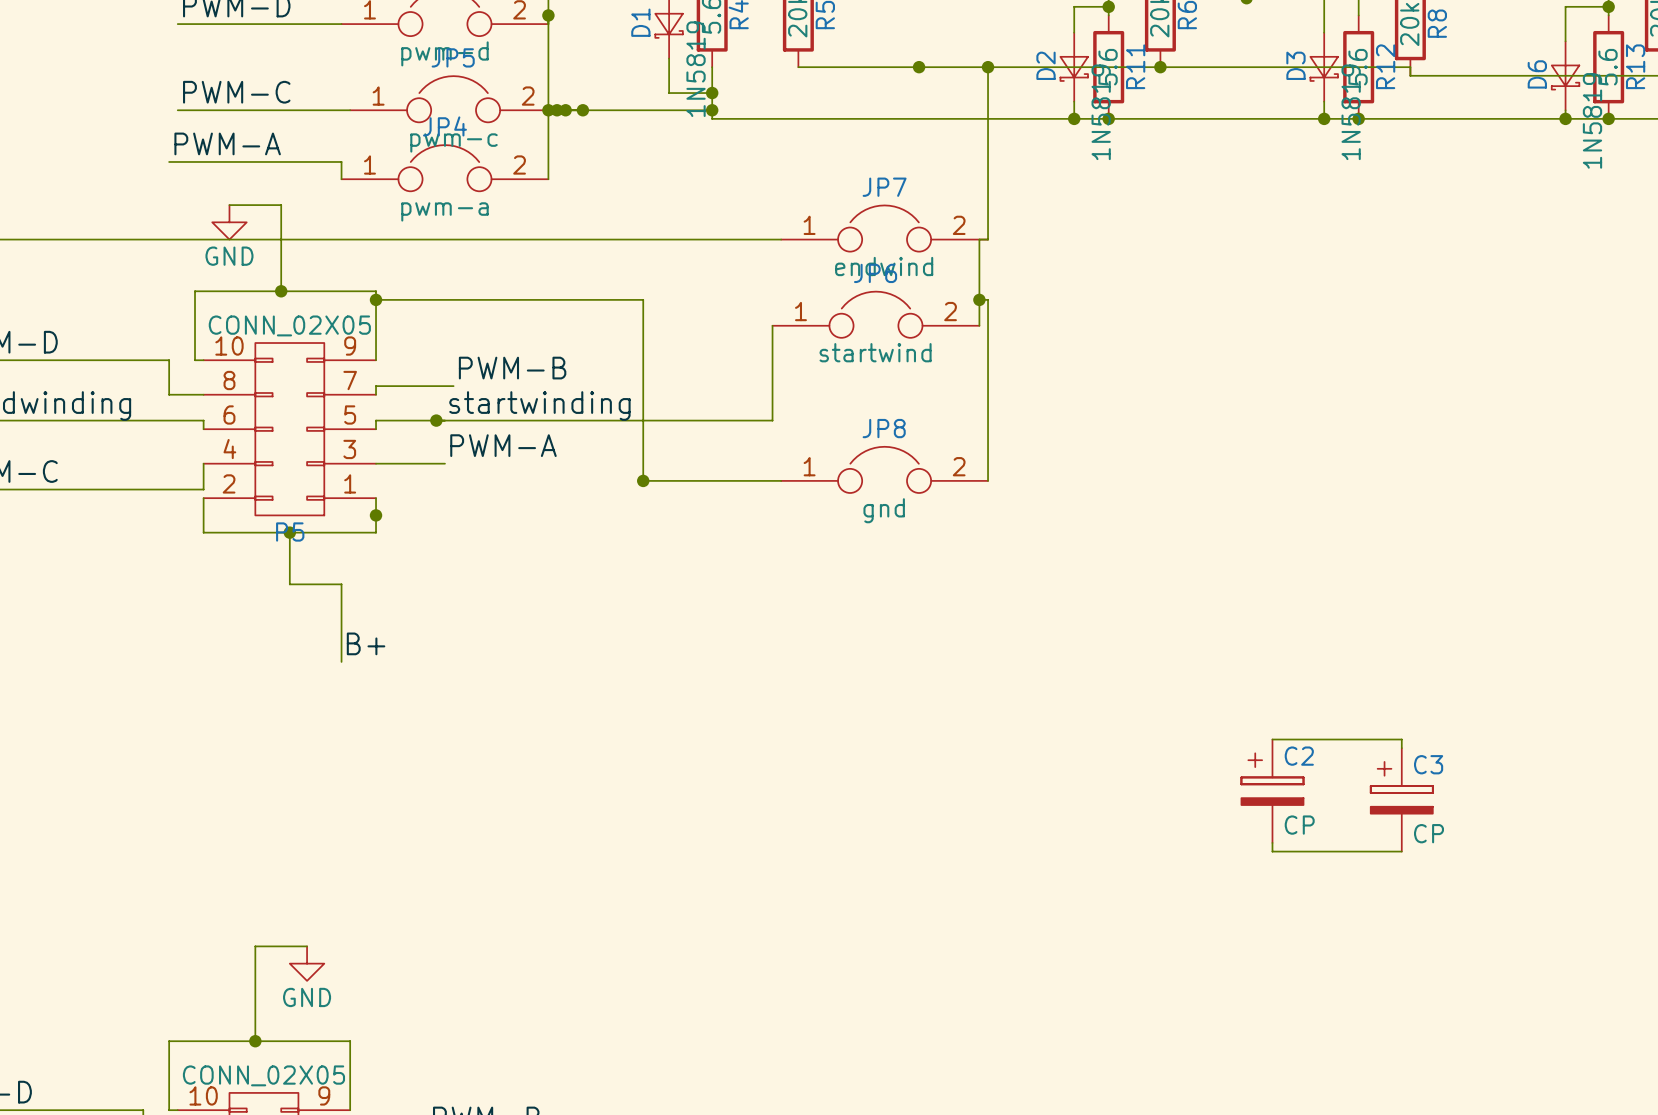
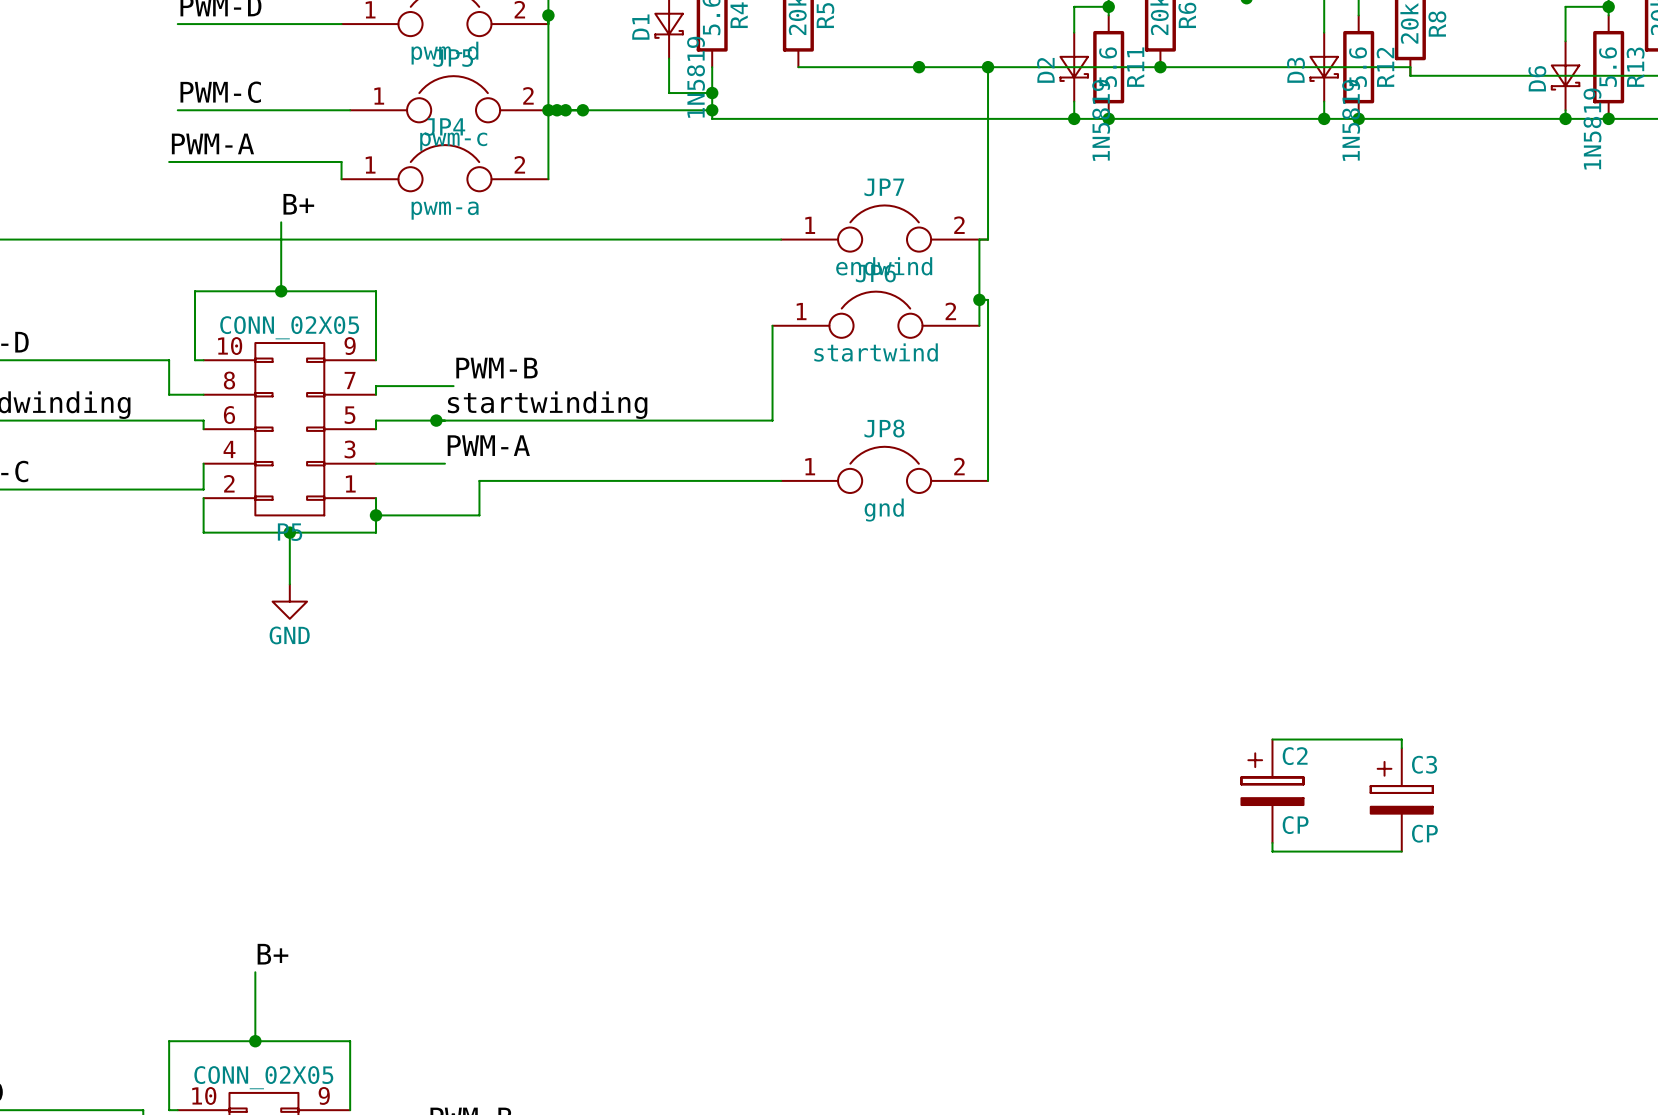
label: none -> B+ (298, 204)
wire: (229, 205) (281, 205) (281, 222) -> none
power symbol: GND (229, 222) -> none
wire: (376, 299) (643, 299) (643, 480) -> (376, 515) (479, 515) (479, 480) (643, 480)
junction: (376, 299) -> none
junction: (643, 480) -> none
wire: (289, 584) (341, 584) (341, 661) -> none
power symbol: none -> GND (289, 601)
label: B+ (366, 643) -> none
wire: (307, 946) (255, 946) (255, 972) -> none
label: none -> B+ (272, 954)
power symbol: GND (307, 963) -> none

